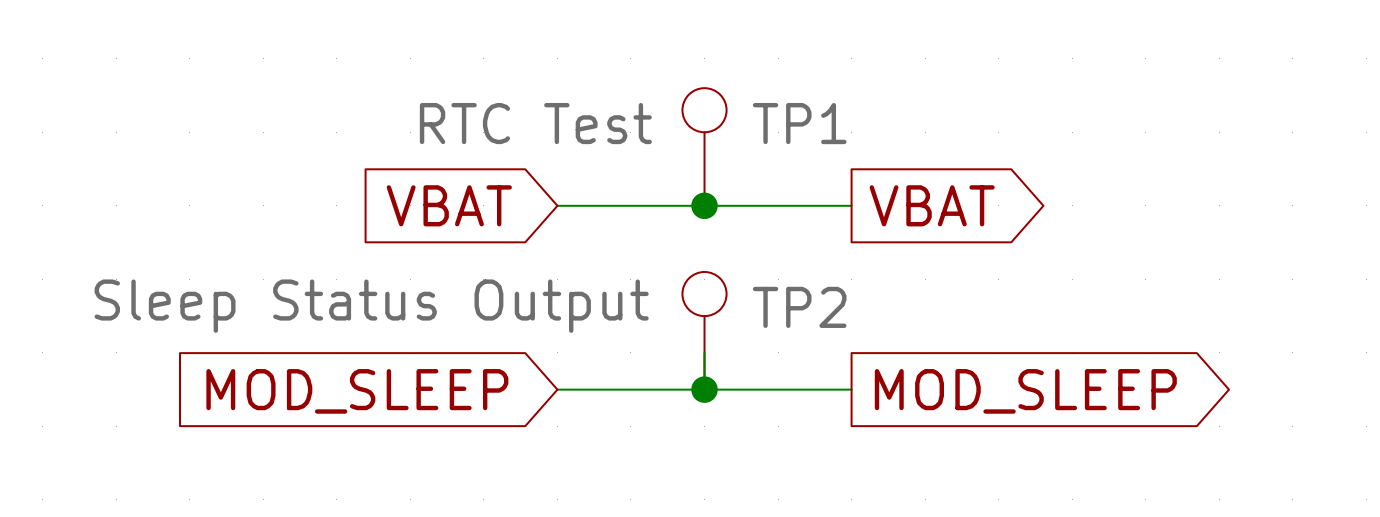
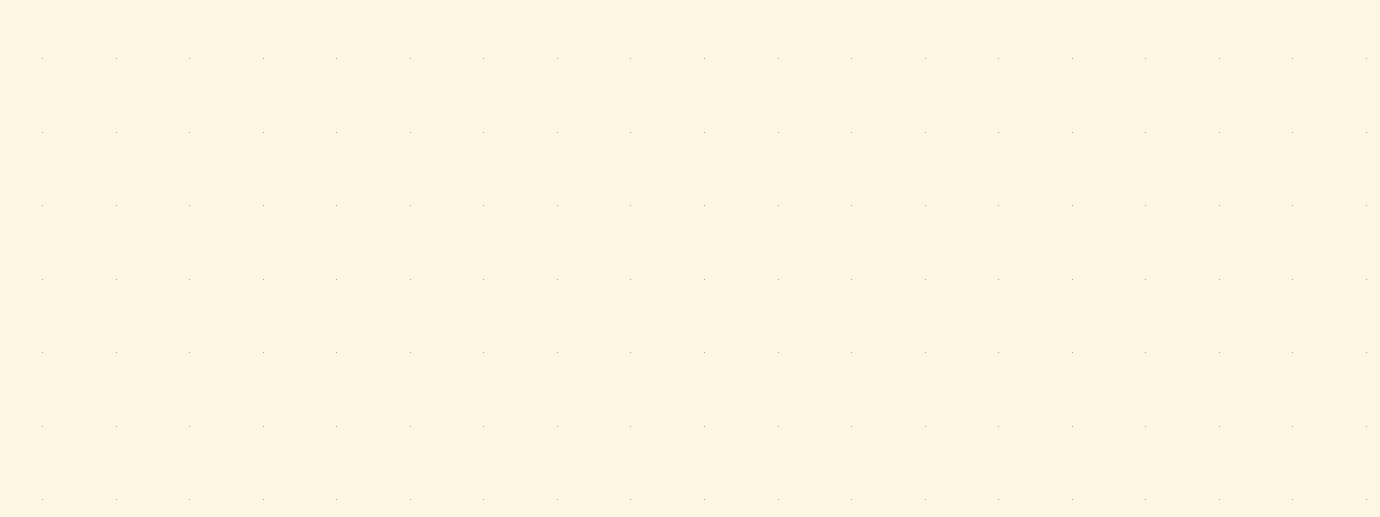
TP1: RTC Test (704, 146) -> none
global label: VBAT (449, 205) -> none
wire: (557, 205) (851, 205) -> none
junction: (704, 205) -> none
global label: VBAT (932, 205) -> none
TP2: Sleep Status Output (704, 330) -> none
wire: (704, 352) (704, 389) -> none
wire: (557, 389) (851, 389) -> none
junction: (704, 389) -> none
global label: MOD_SLEEP (357, 391) -> none
global label: MOD_SLEEP (1025, 391) -> none

